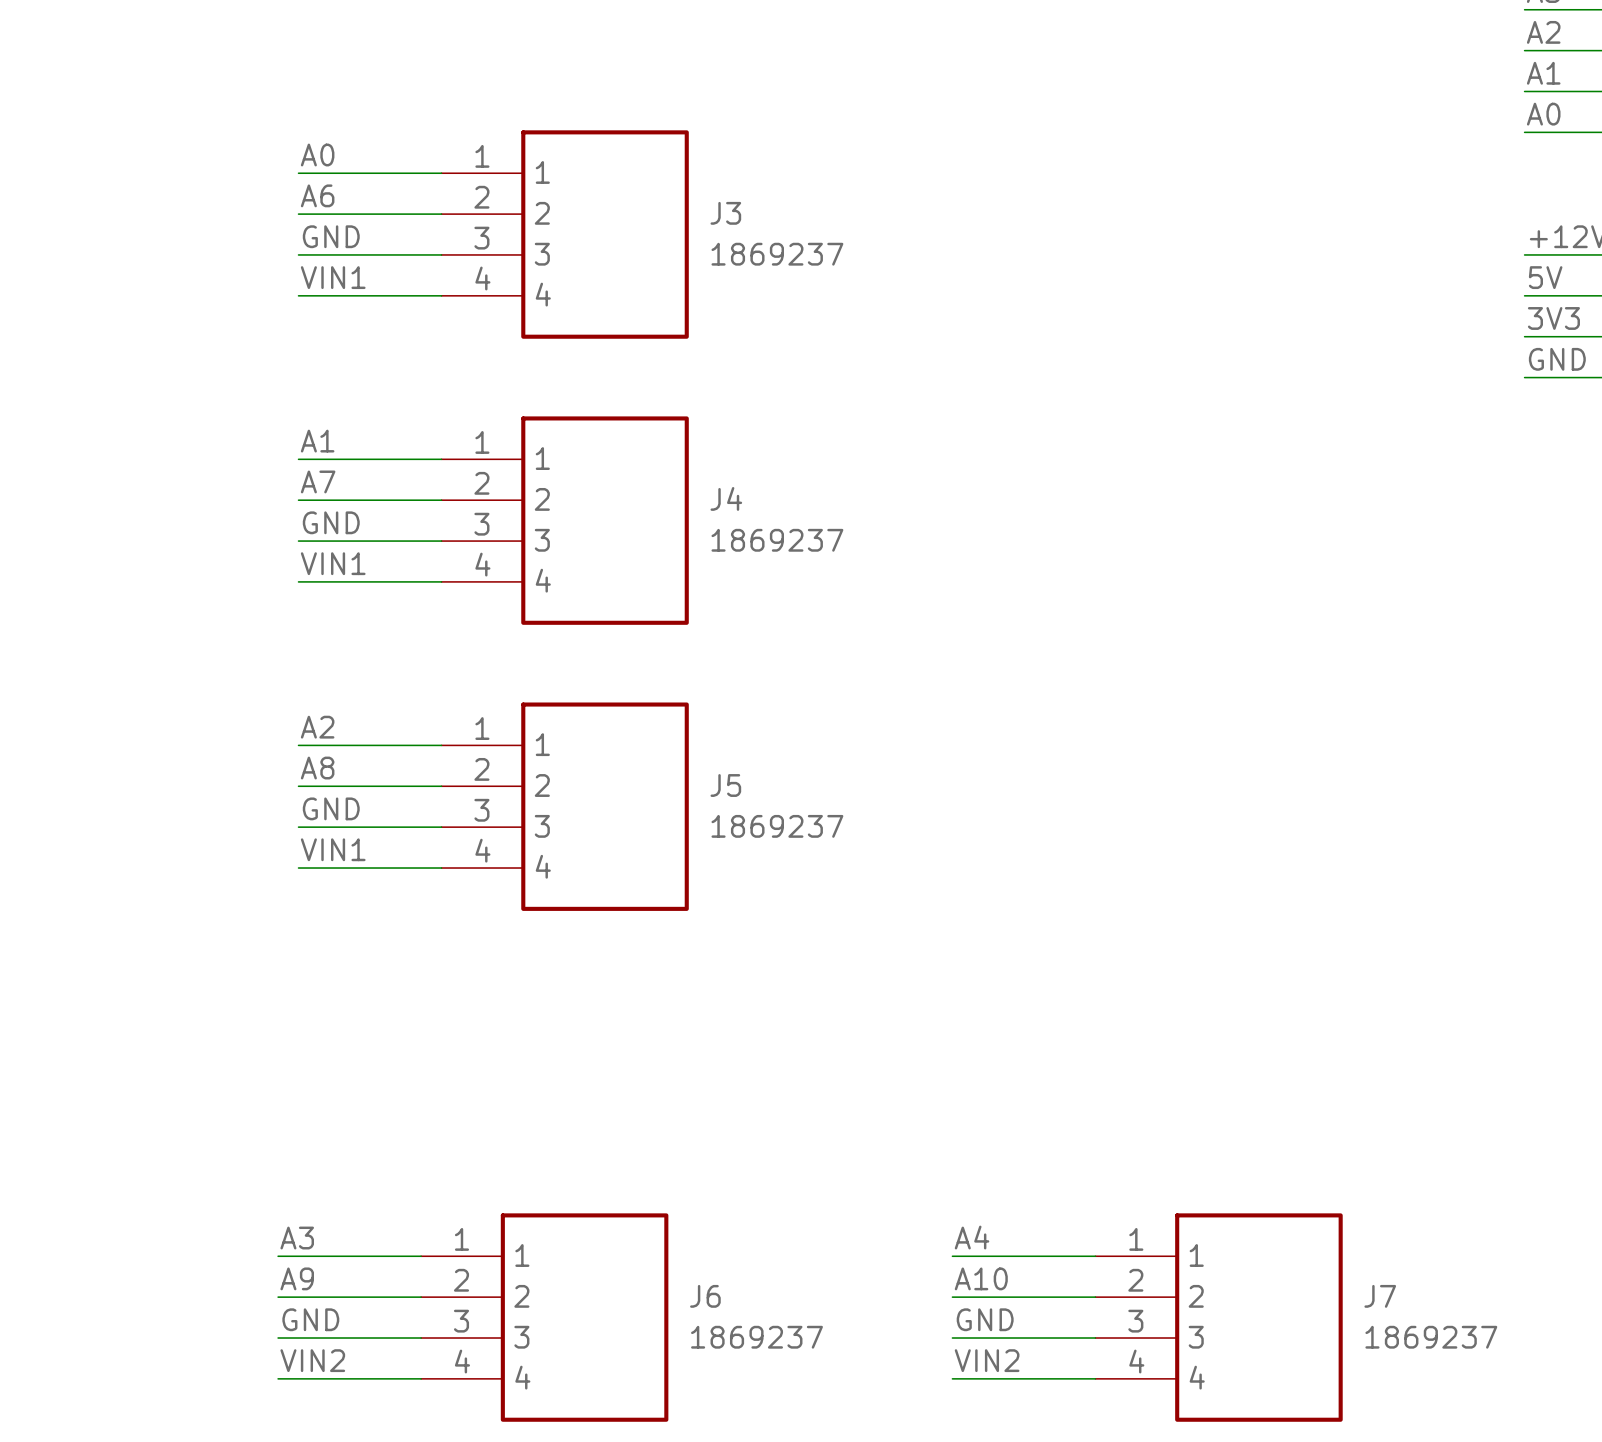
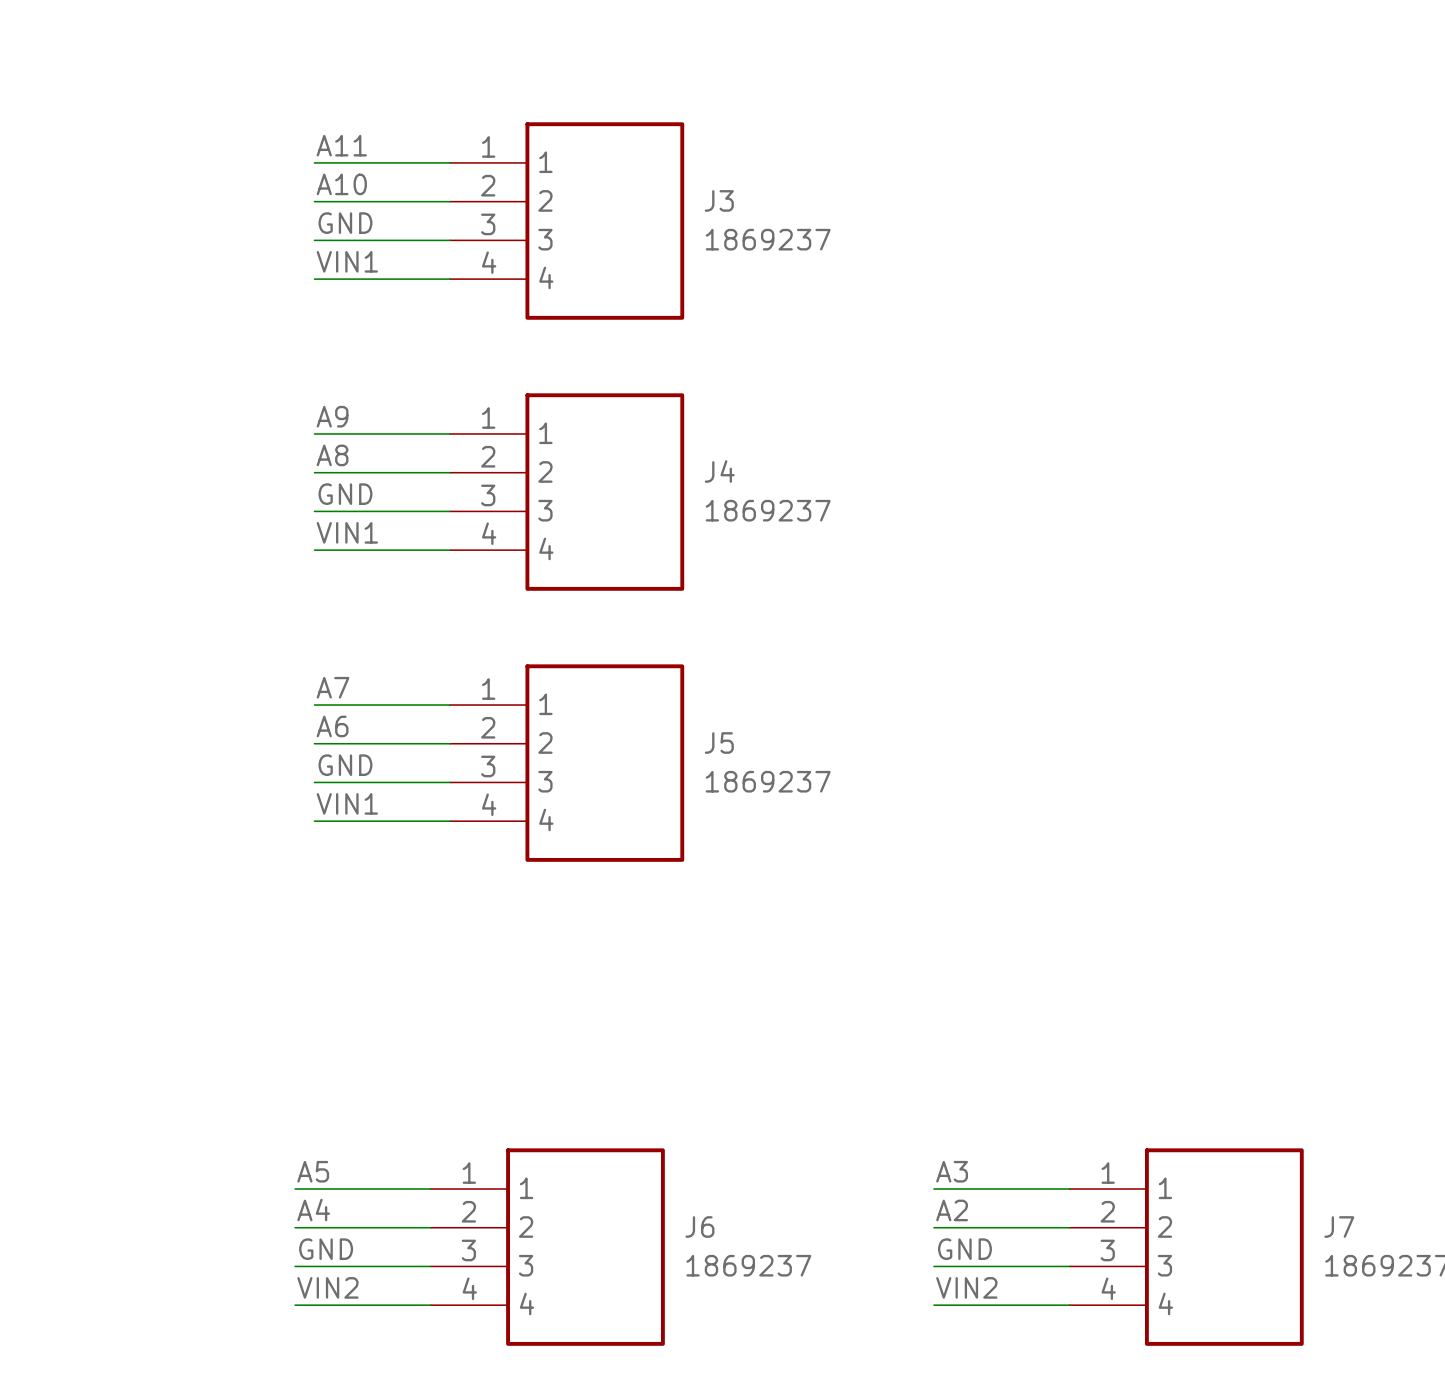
label: A0 (317, 155) -> A11 (341, 145)
label: A6 (317, 195) -> A10 (341, 184)
label: A1 (317, 441) -> A9 (332, 416)
label: A7 (318, 481) -> A8 (332, 455)
label: A2 (317, 727) -> A7 (333, 687)
label: A8 (317, 768) -> A6 (332, 726)
label: A4 (972, 1237) -> A3 (952, 1171)
label: A3 (297, 1238) -> A5 (313, 1171)
label: A9 (297, 1278) -> A4 (313, 1209)
label: A10 (981, 1278) -> A2 (952, 1210)

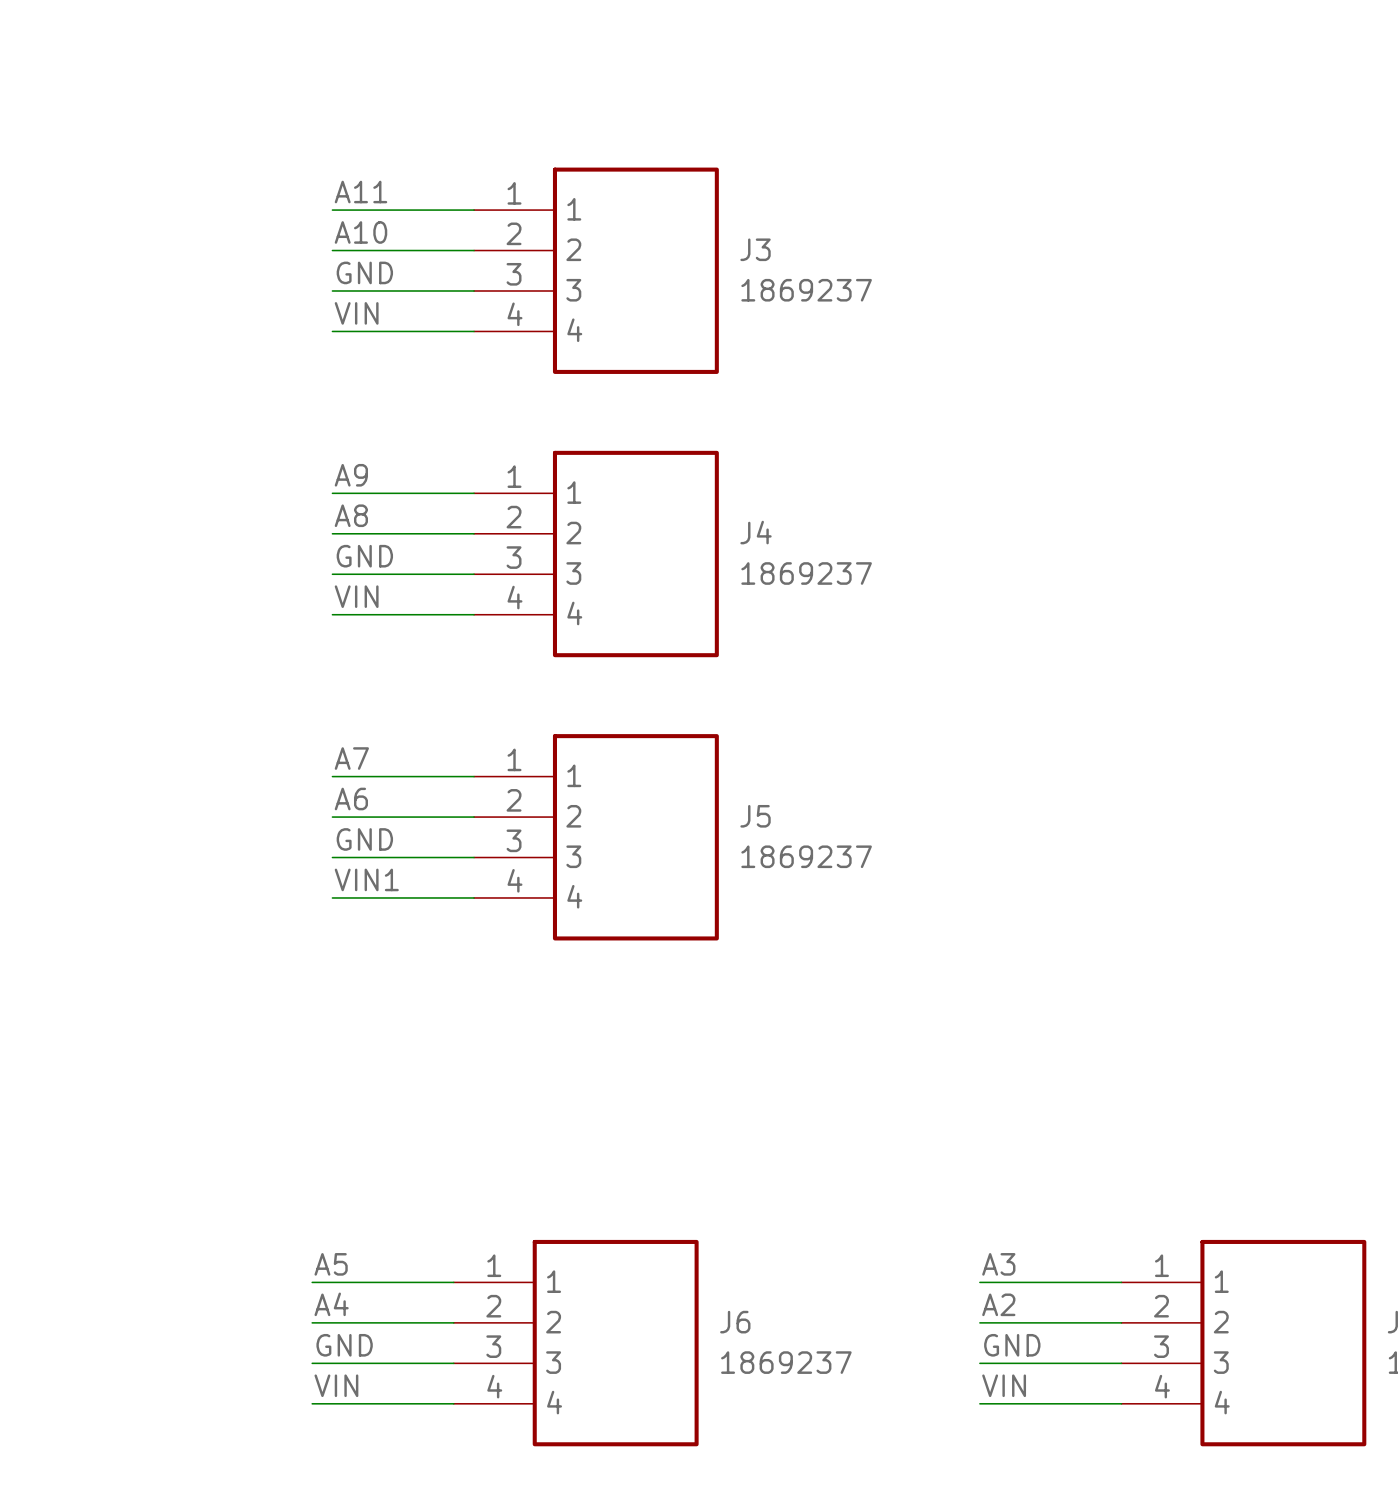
label: VIN1 (347, 261) -> VIN (356, 313)
label: VIN1 (347, 532) -> VIN (356, 596)
label: VIN2 (327, 1287) -> VIN (336, 1385)
label: VIN2 (966, 1287) -> VIN (1004, 1385)

